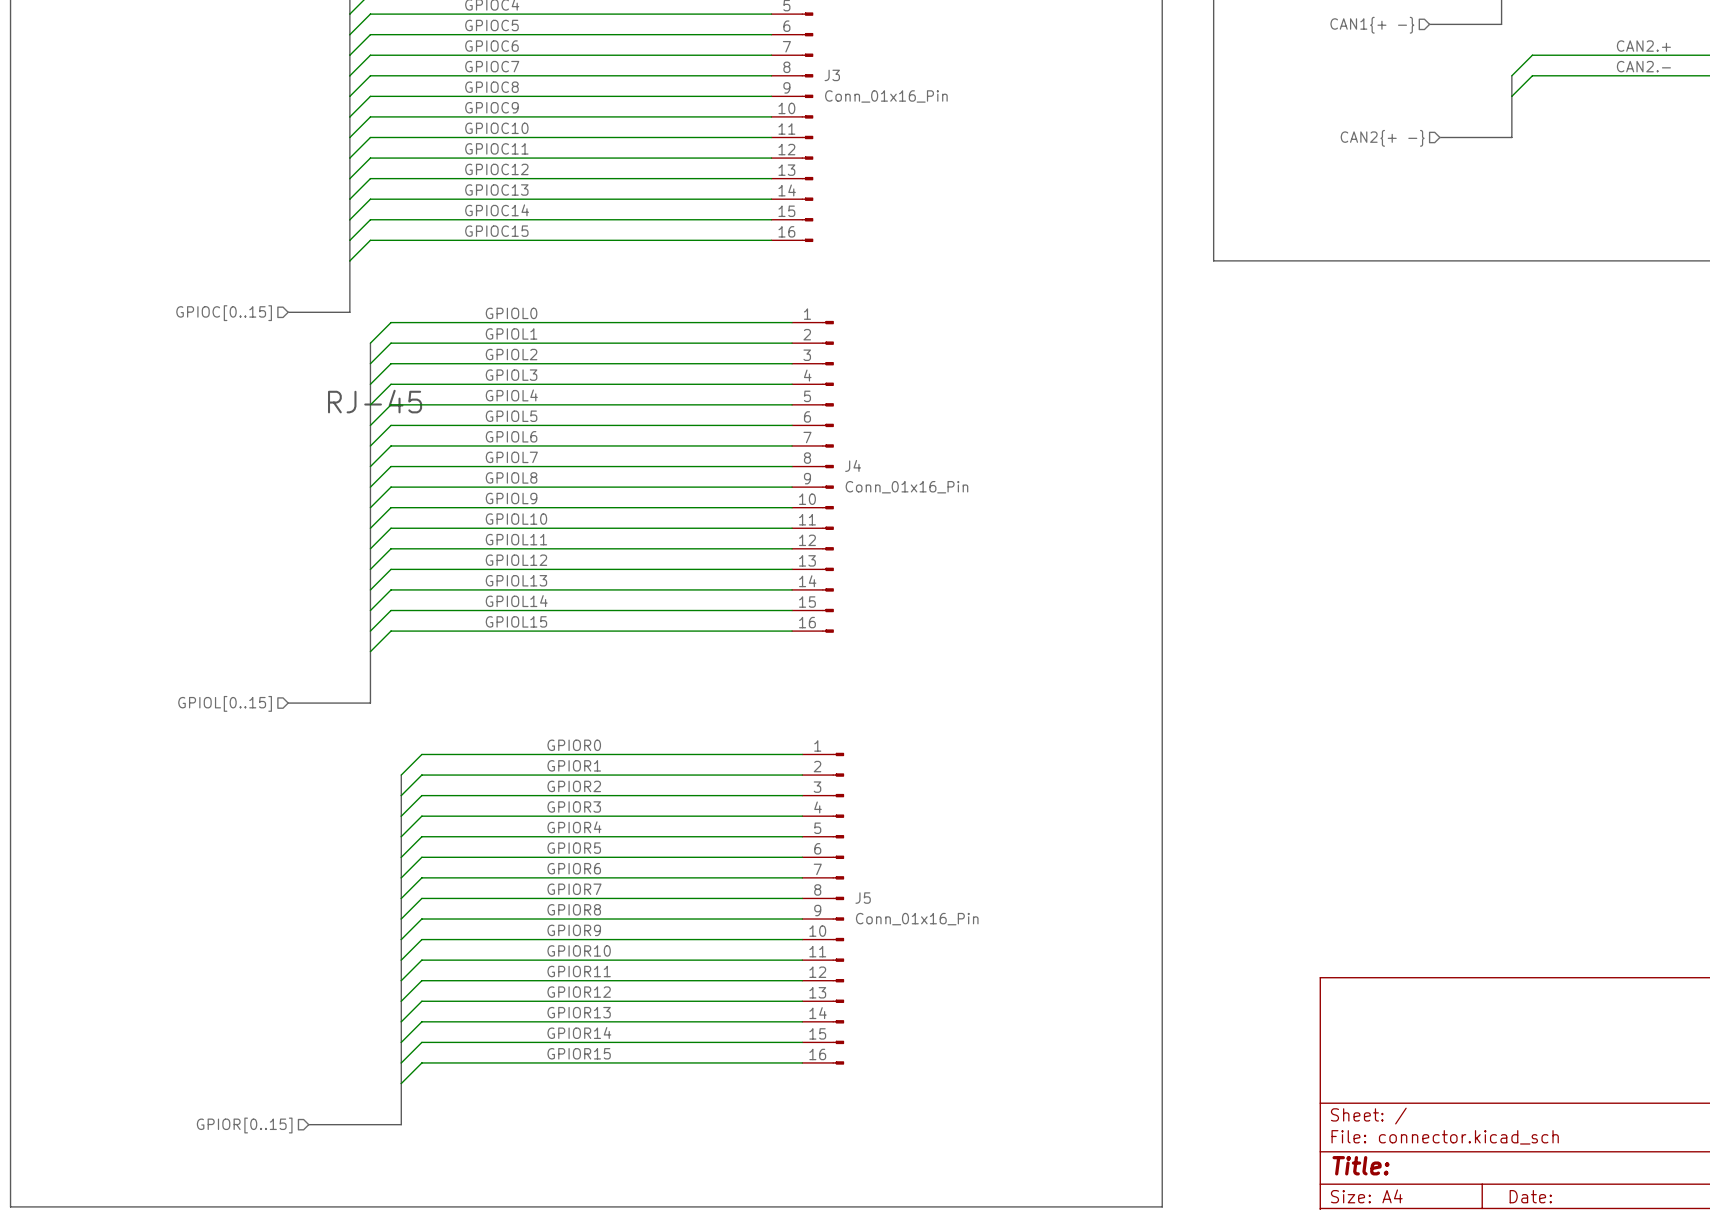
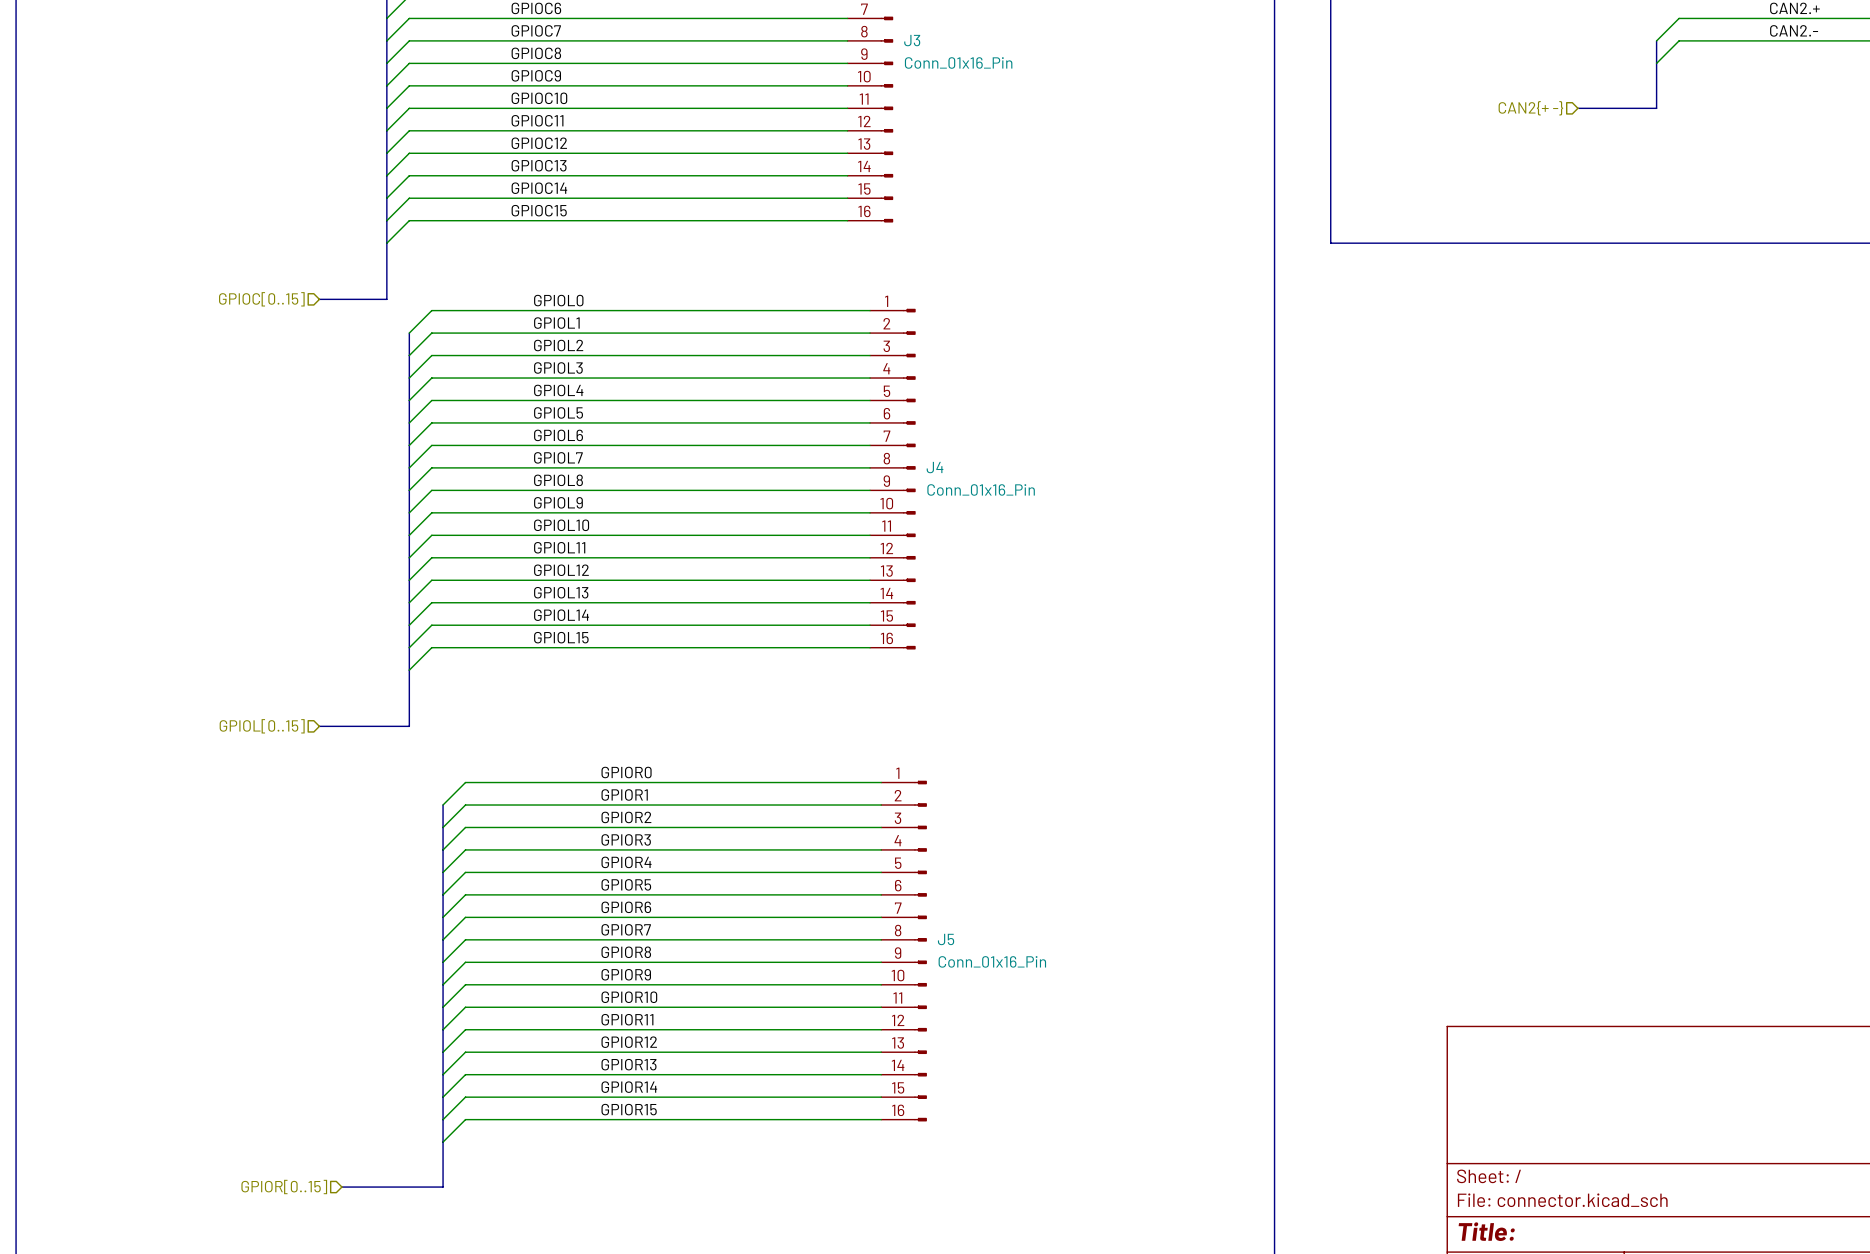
text: RJ-45 (375, 401) -> none

